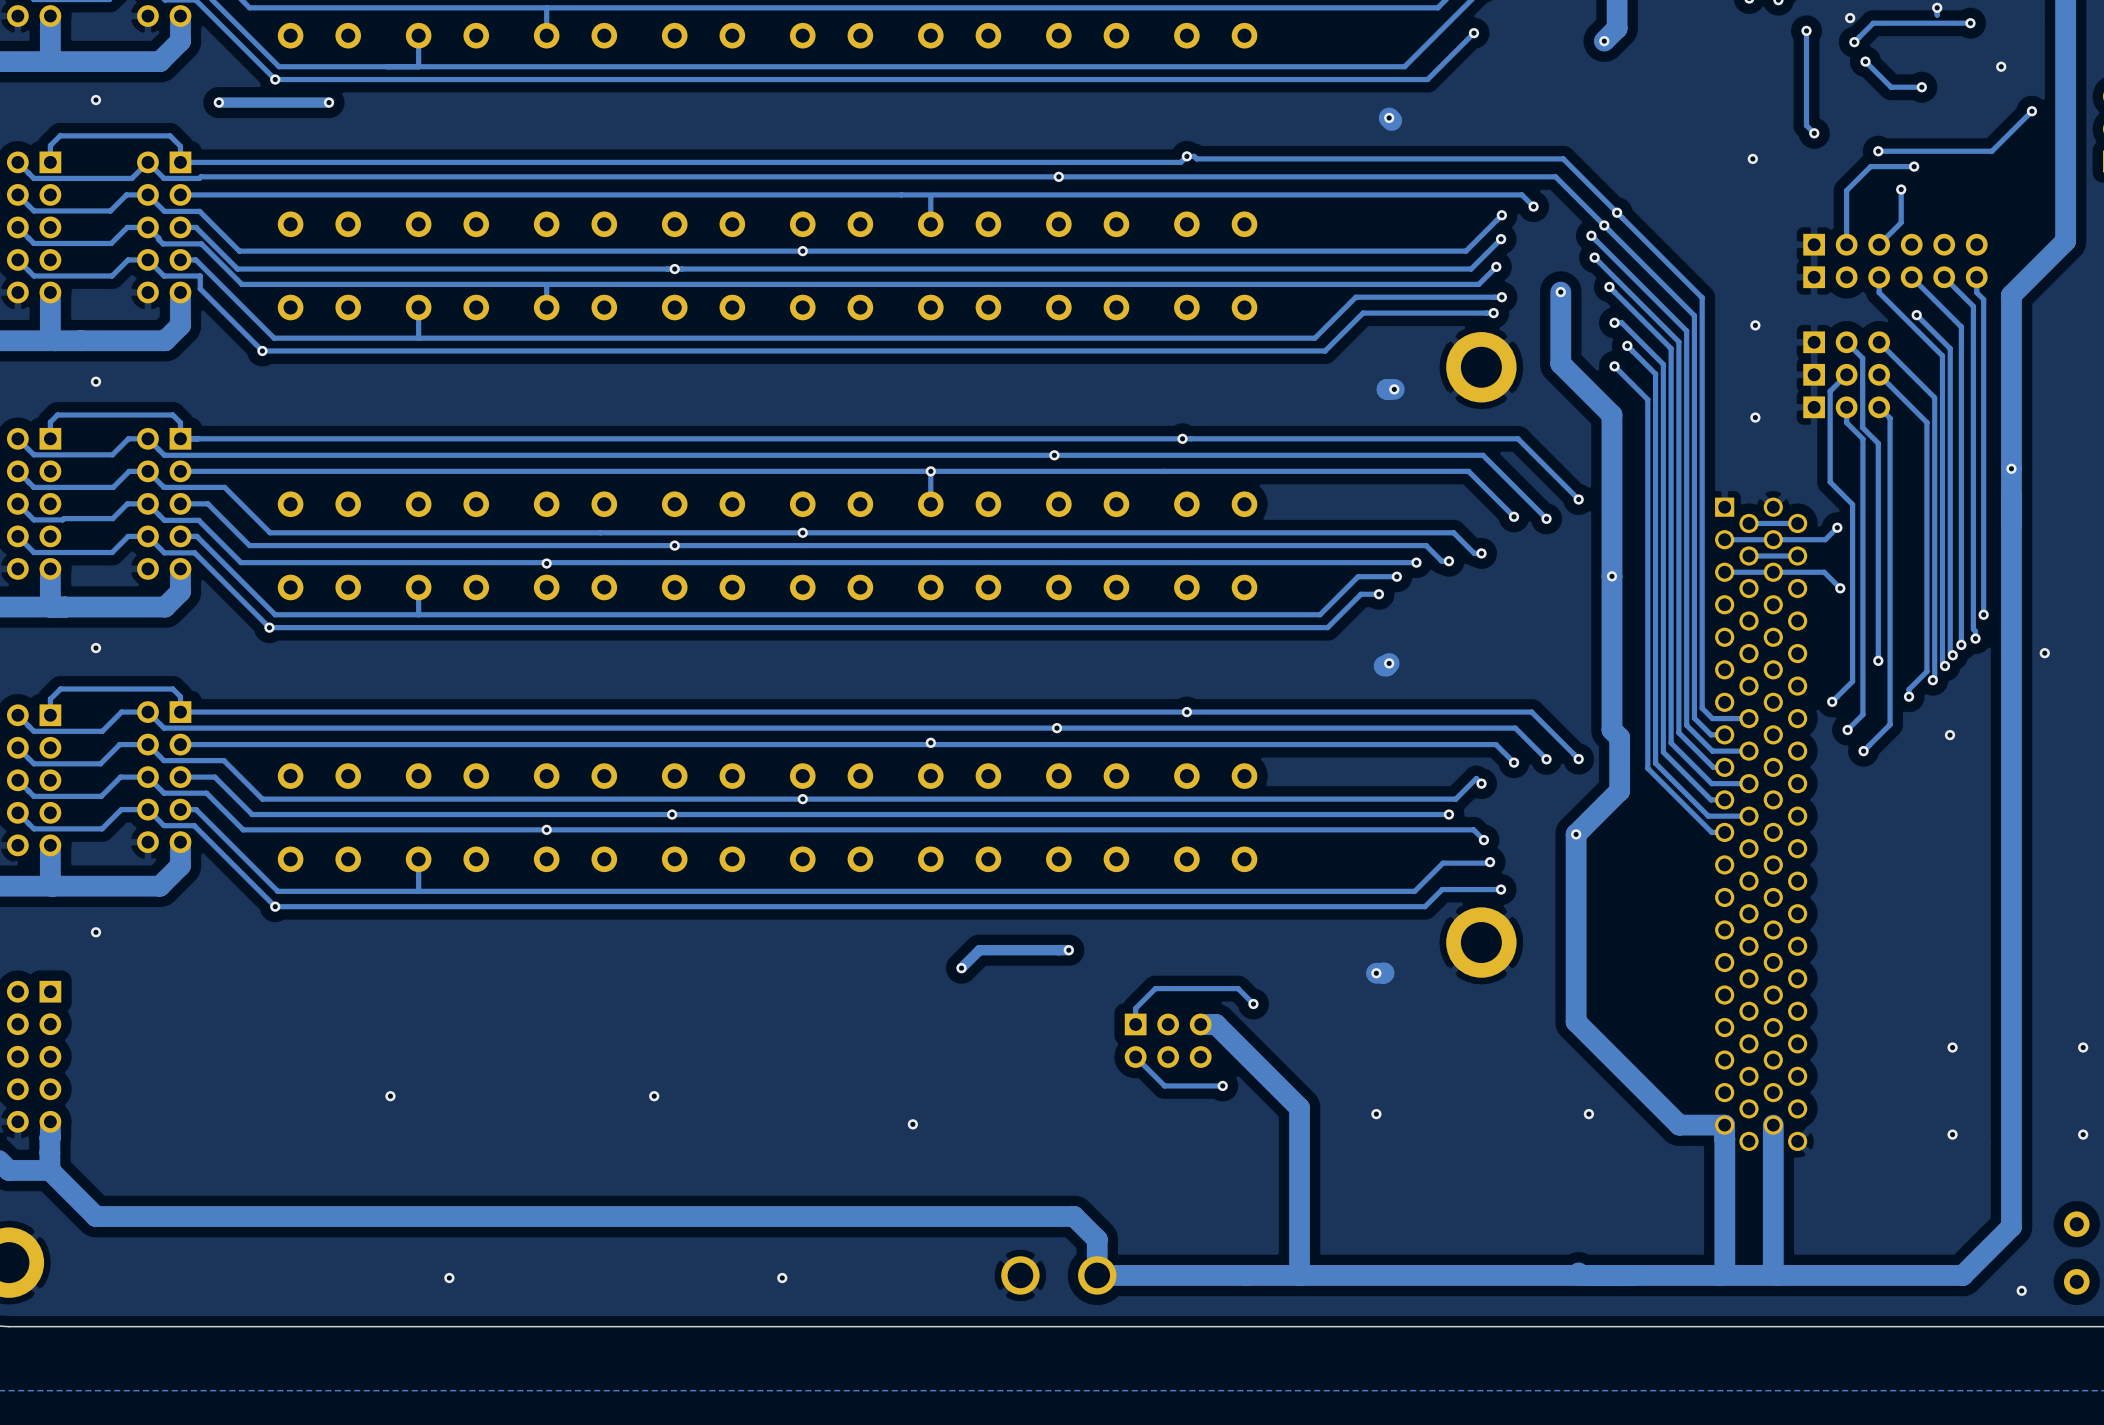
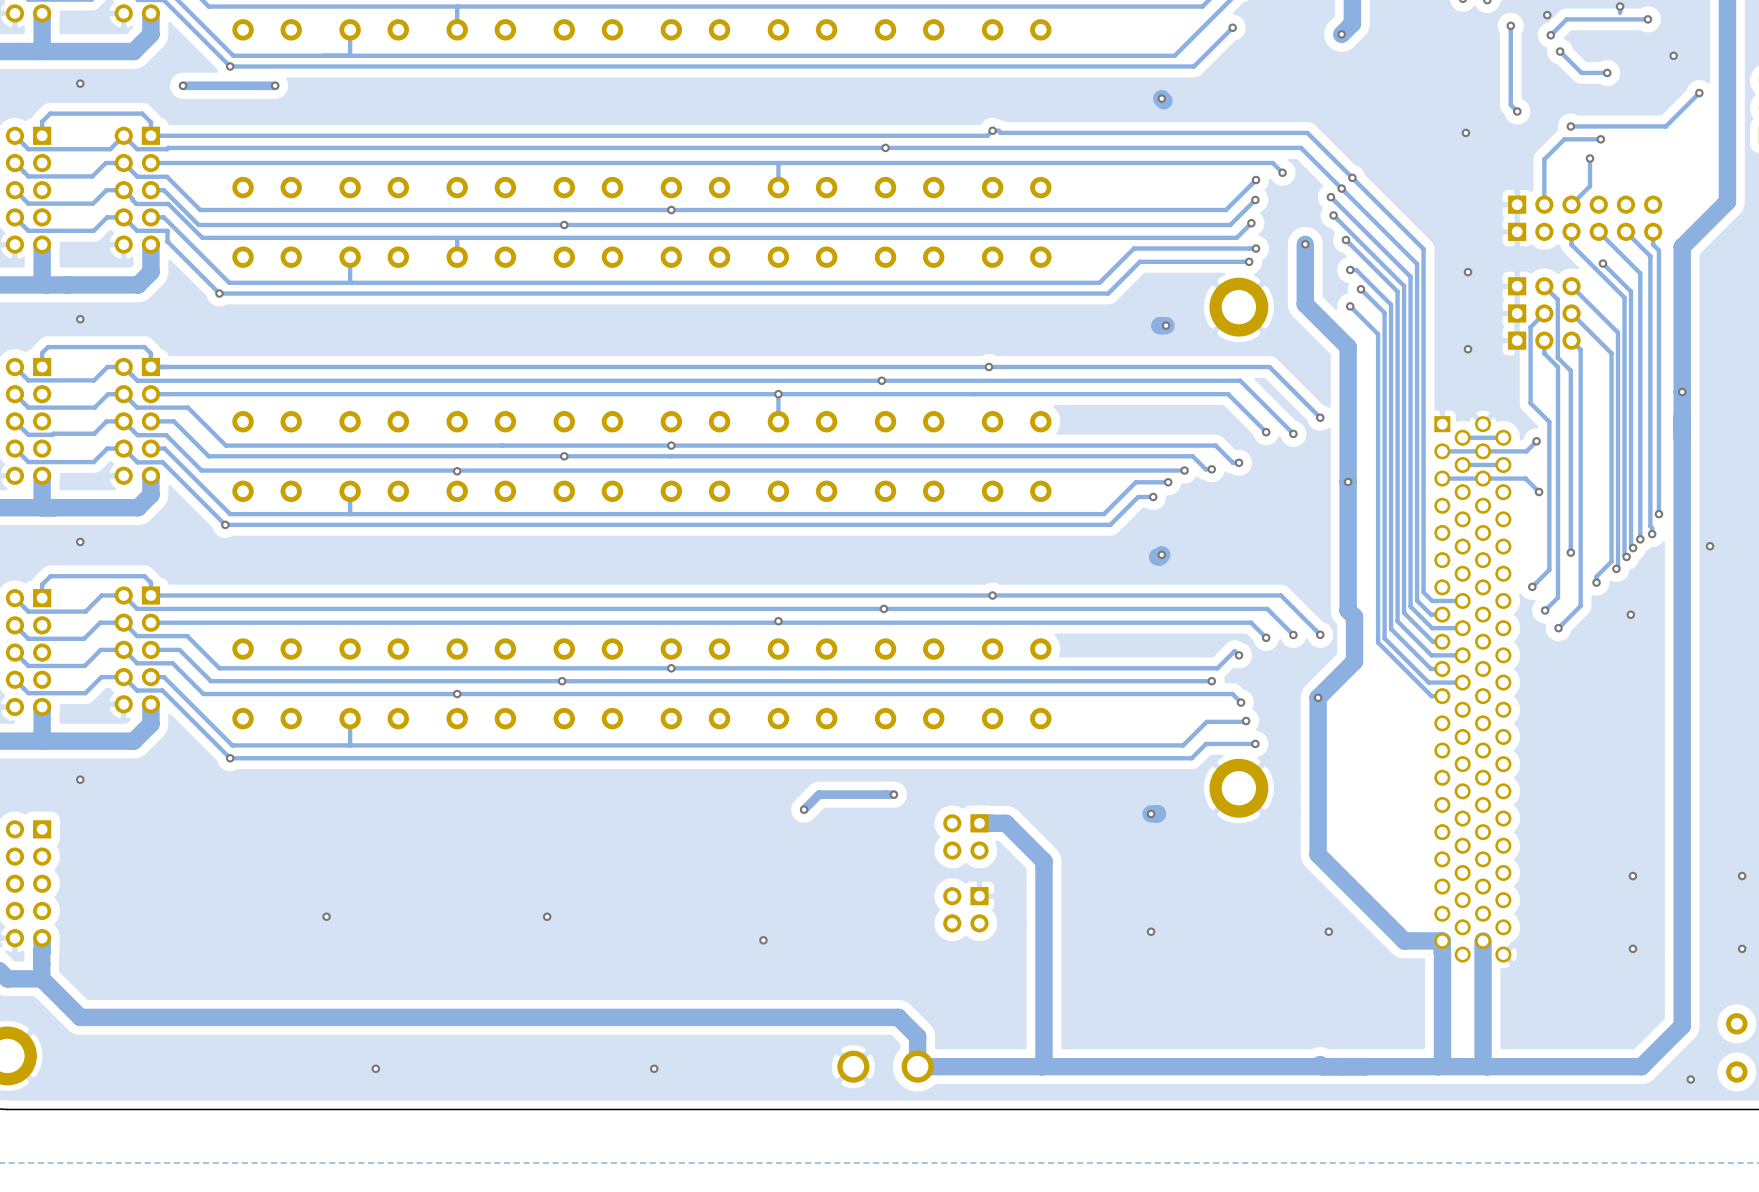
track: none -> (979, 823) (1006, 823) (1043, 861) (1043, 1064) (1041, 1066)
part: none -> (965, 836)
track: (1253, 1003) (1238, 988) (1155, 988) (1135, 1008) (1135, 1024) -> none
via: (1253, 1003) -> none
track: (1200, 1024) (1216, 1024) (1299, 1107) (1299, 1275) -> none
part: (1168, 1040) -> none
track: (1135, 1057) (1164, 1085) (1222, 1085) -> none
via: (1222, 1085) -> none
part: none -> (965, 909)

